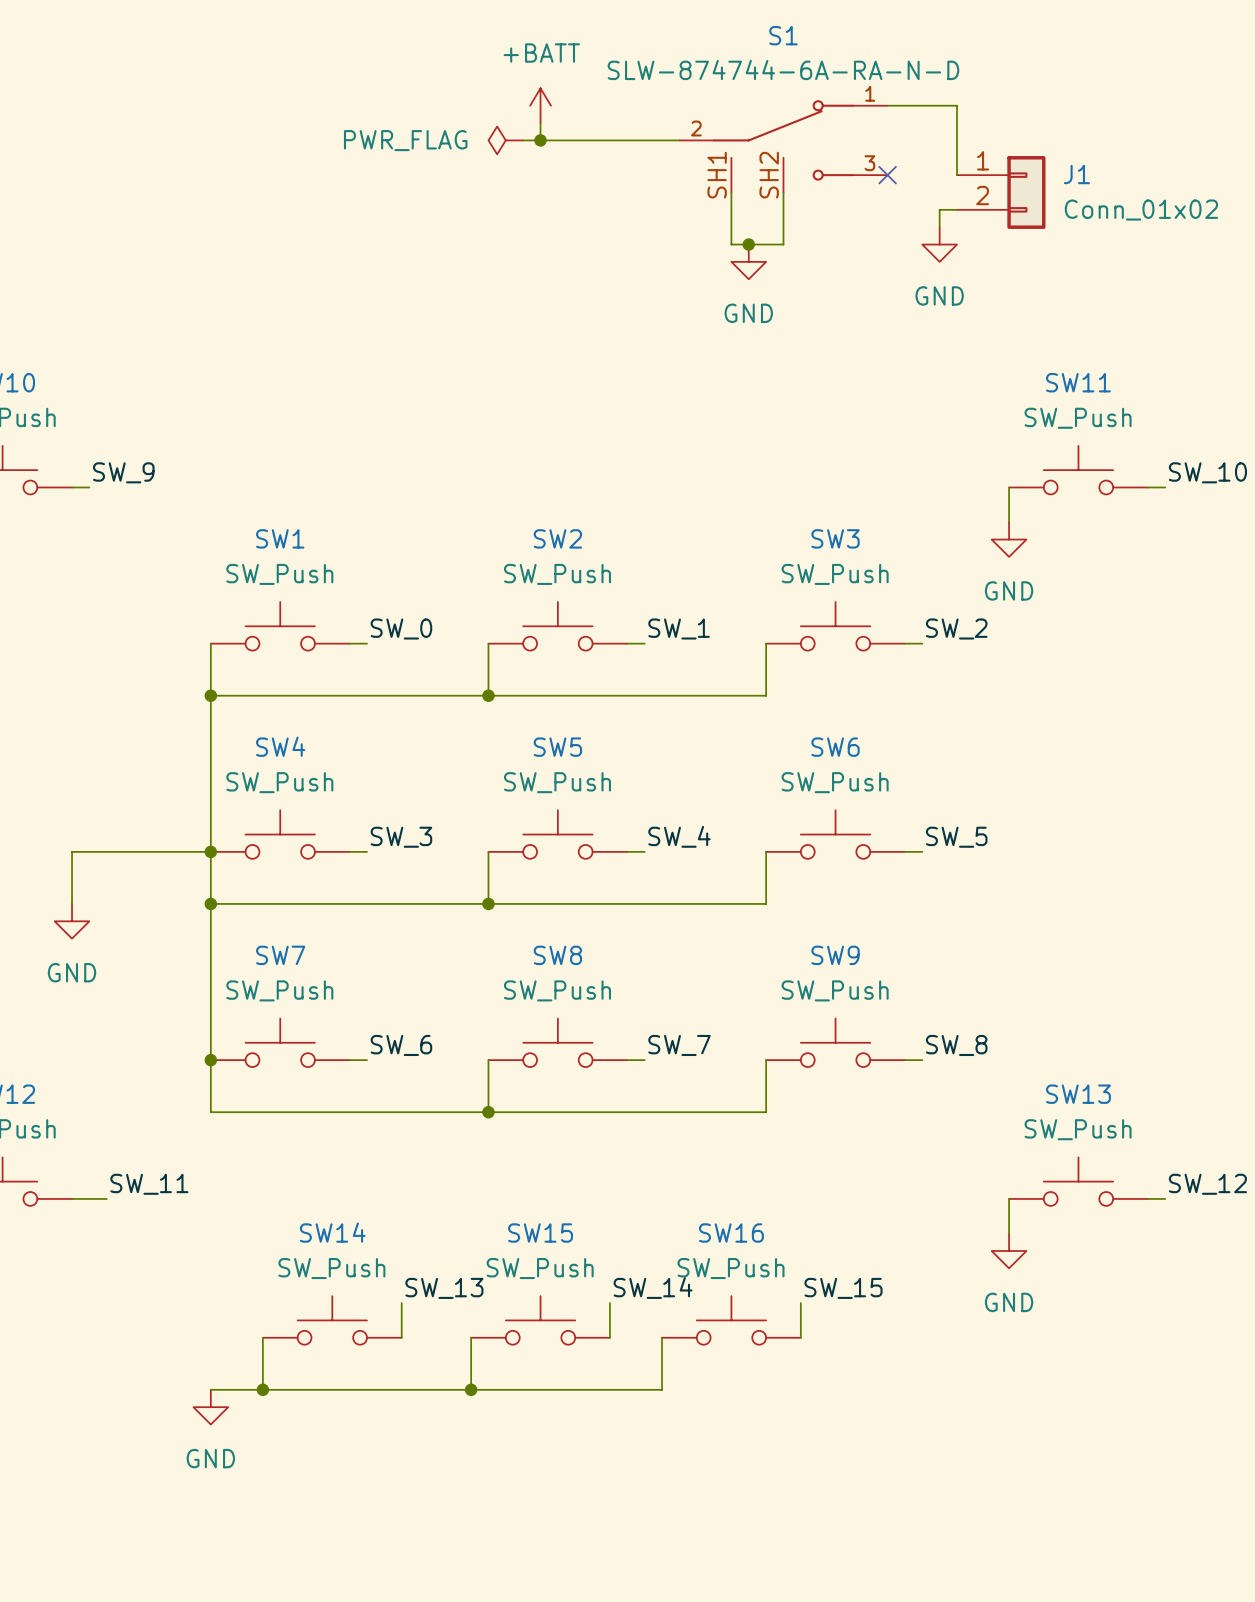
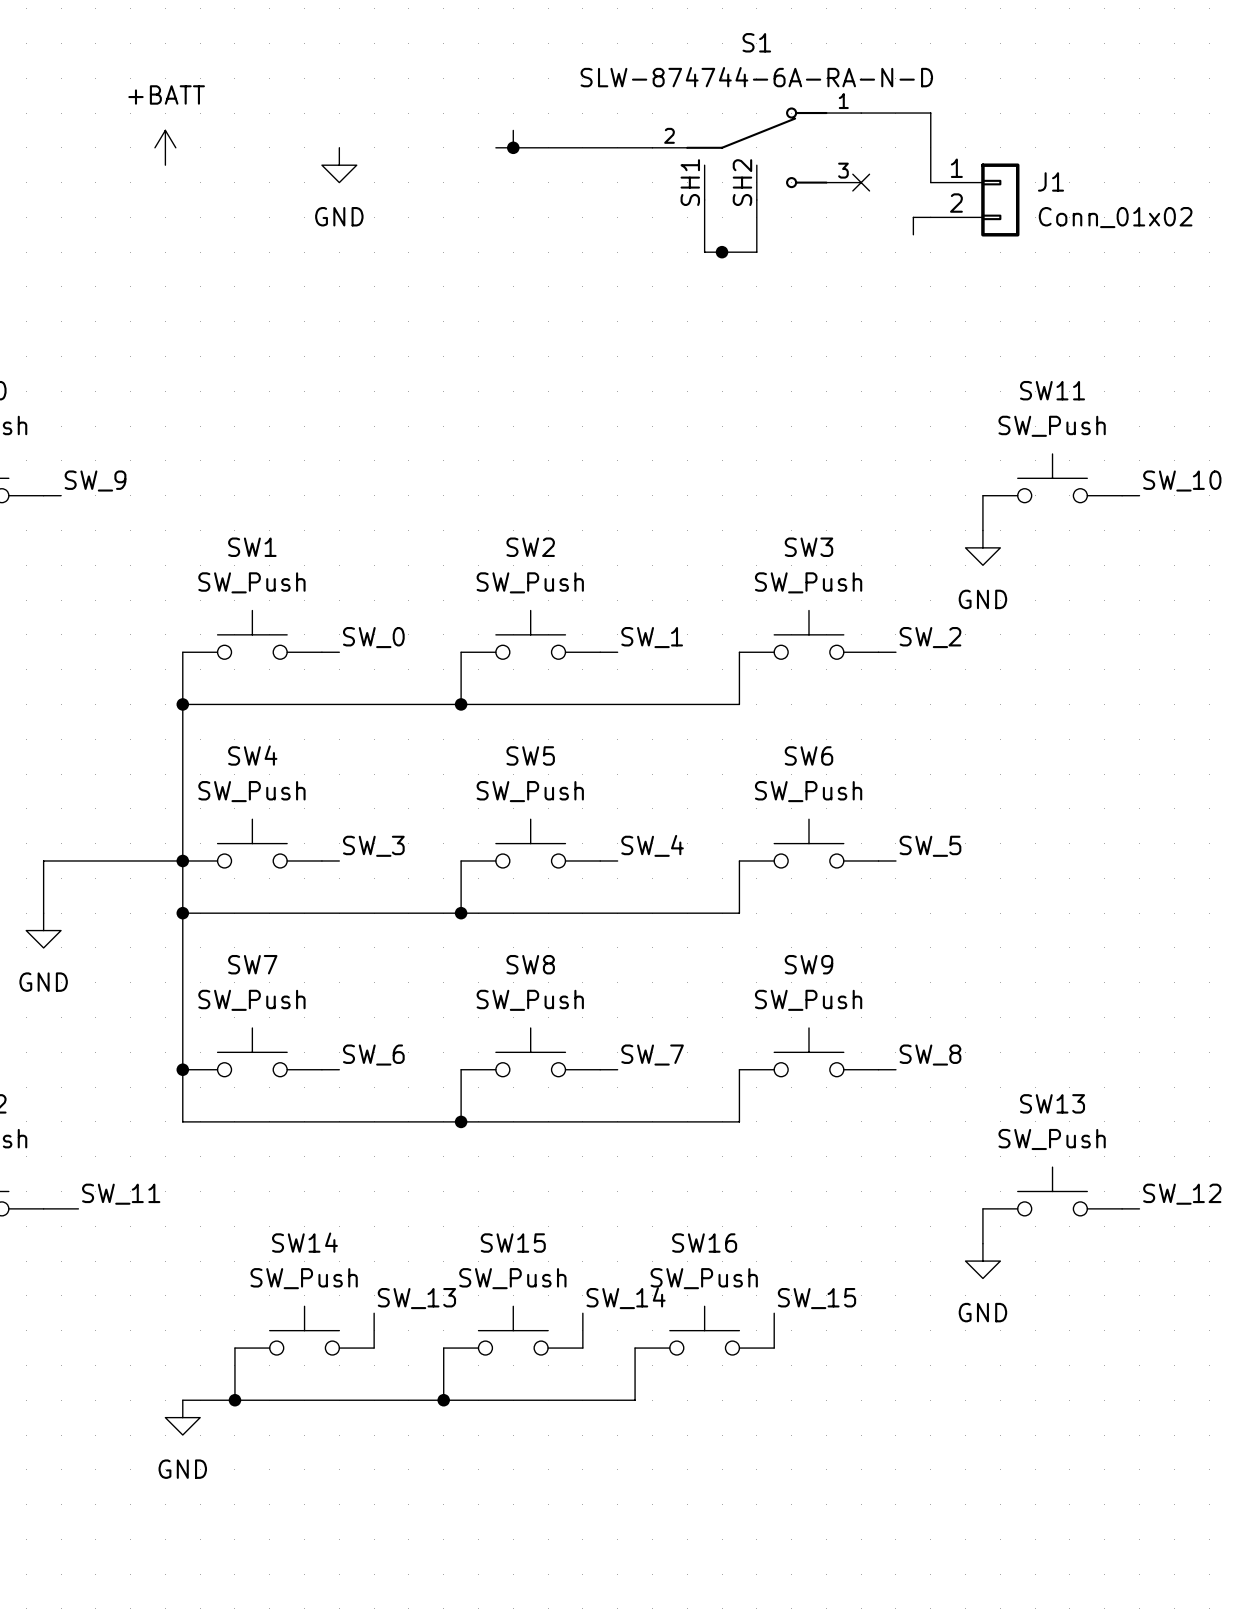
power symbol: +BATT (540, 105) -> none
power symbol: none -> +BATT (165, 147)
power symbol: PWR_FLAG (505, 140) -> none
power symbol: none -> GND (339, 165)
power symbol: GND (939, 244) -> none
power symbol: GND (748, 261) -> none

